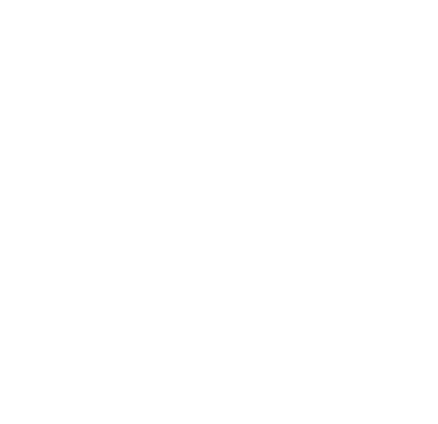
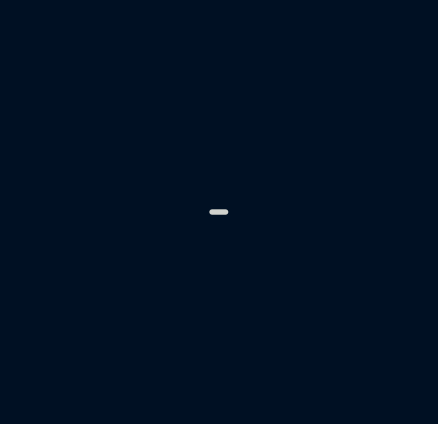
board edge: none -> (225, 212) (212, 212)

